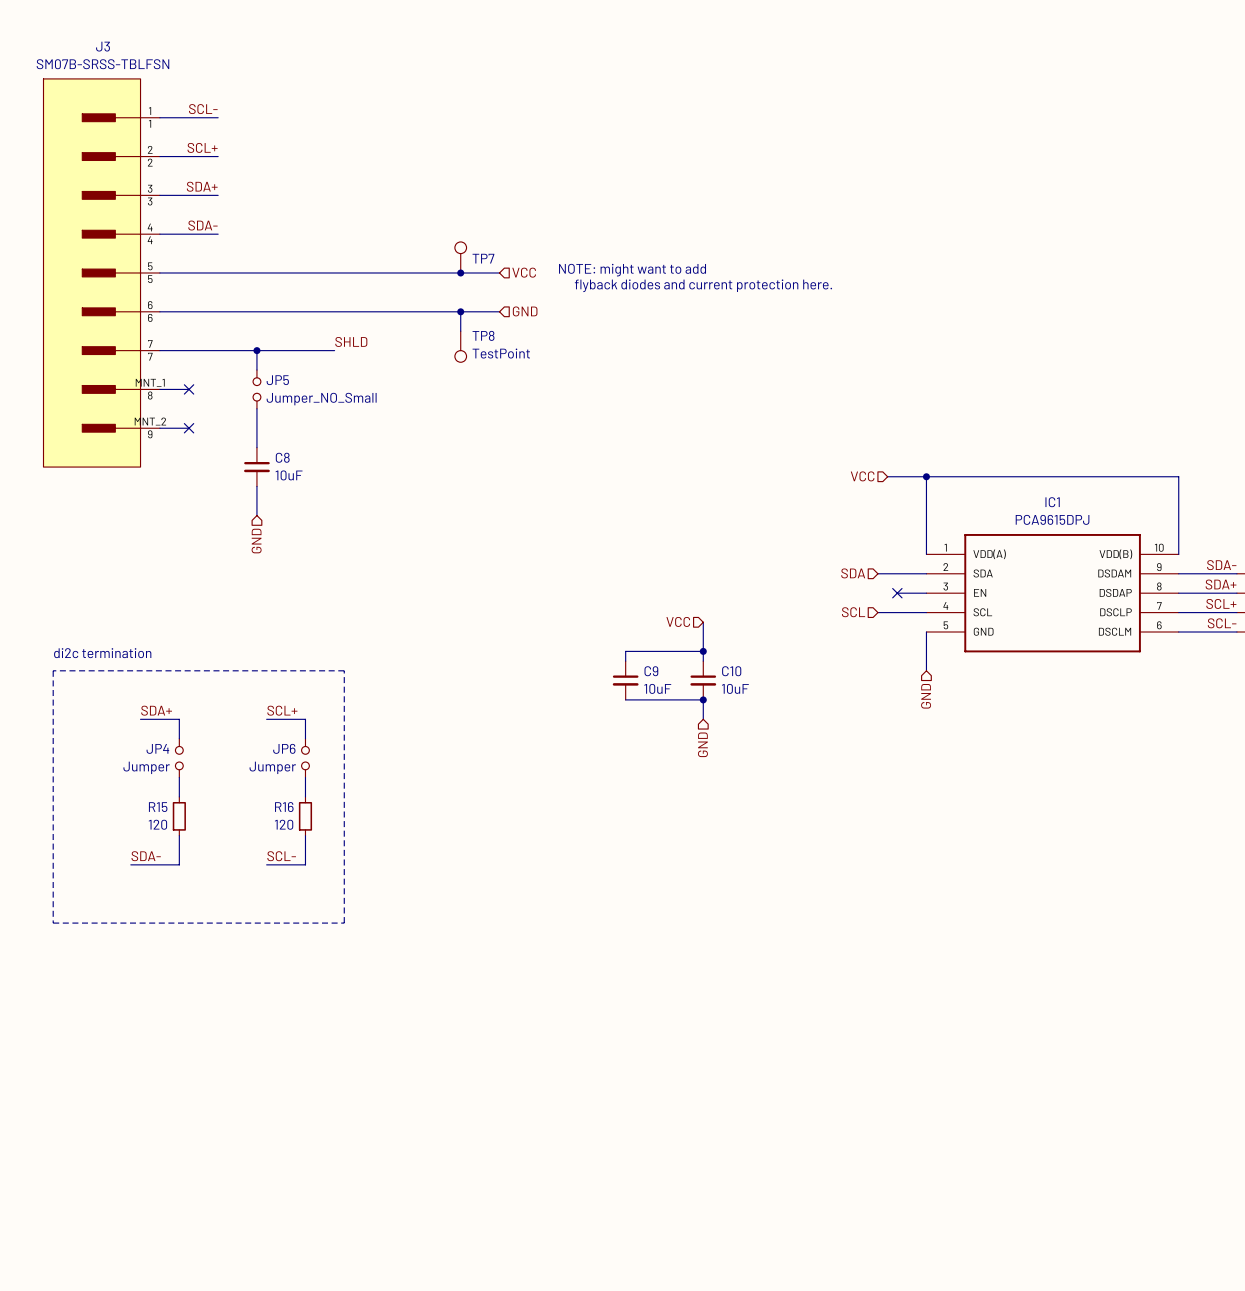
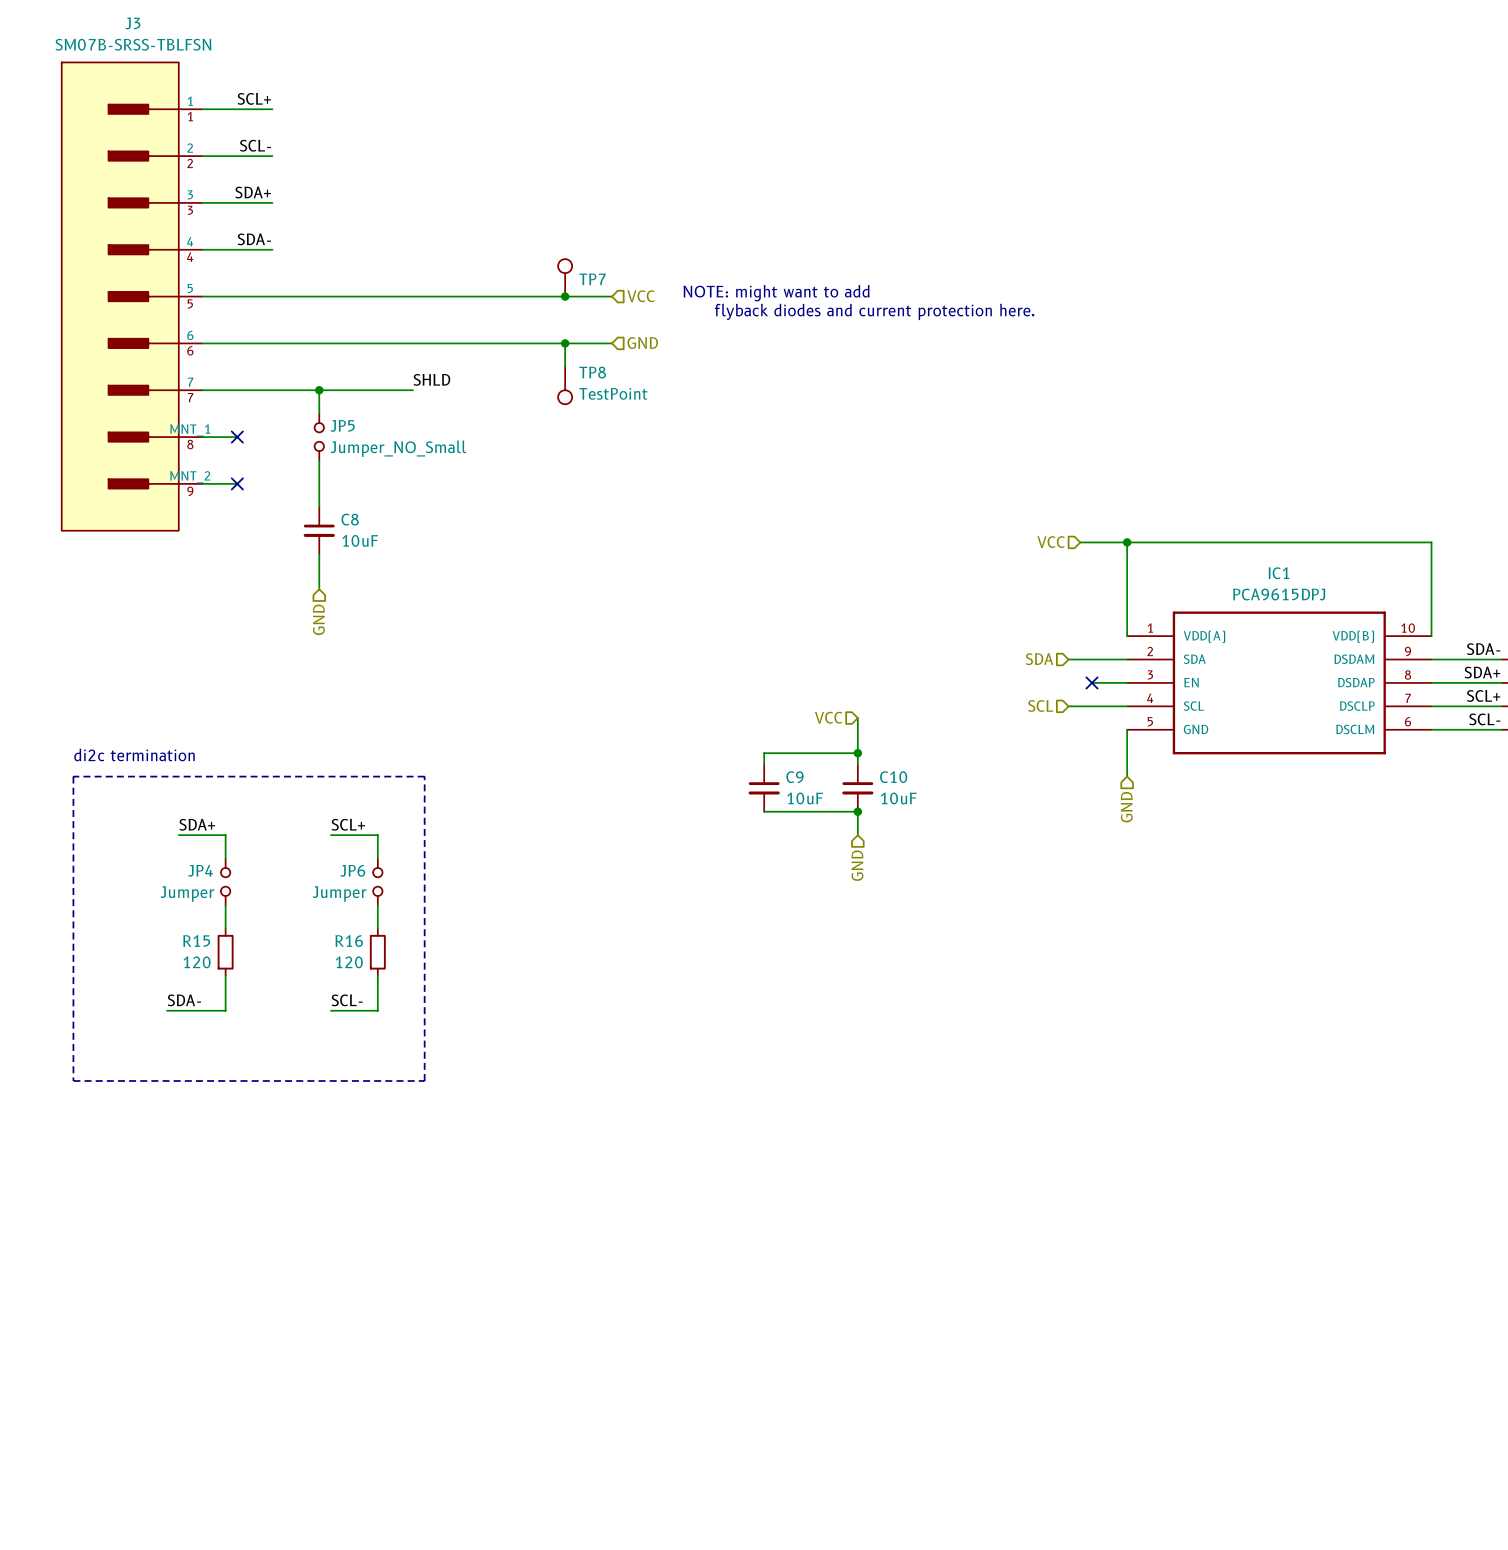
label: SCL- (203, 109) -> SCL+ (254, 98)
label: SCL+ (202, 147) -> SCL- (255, 145)

